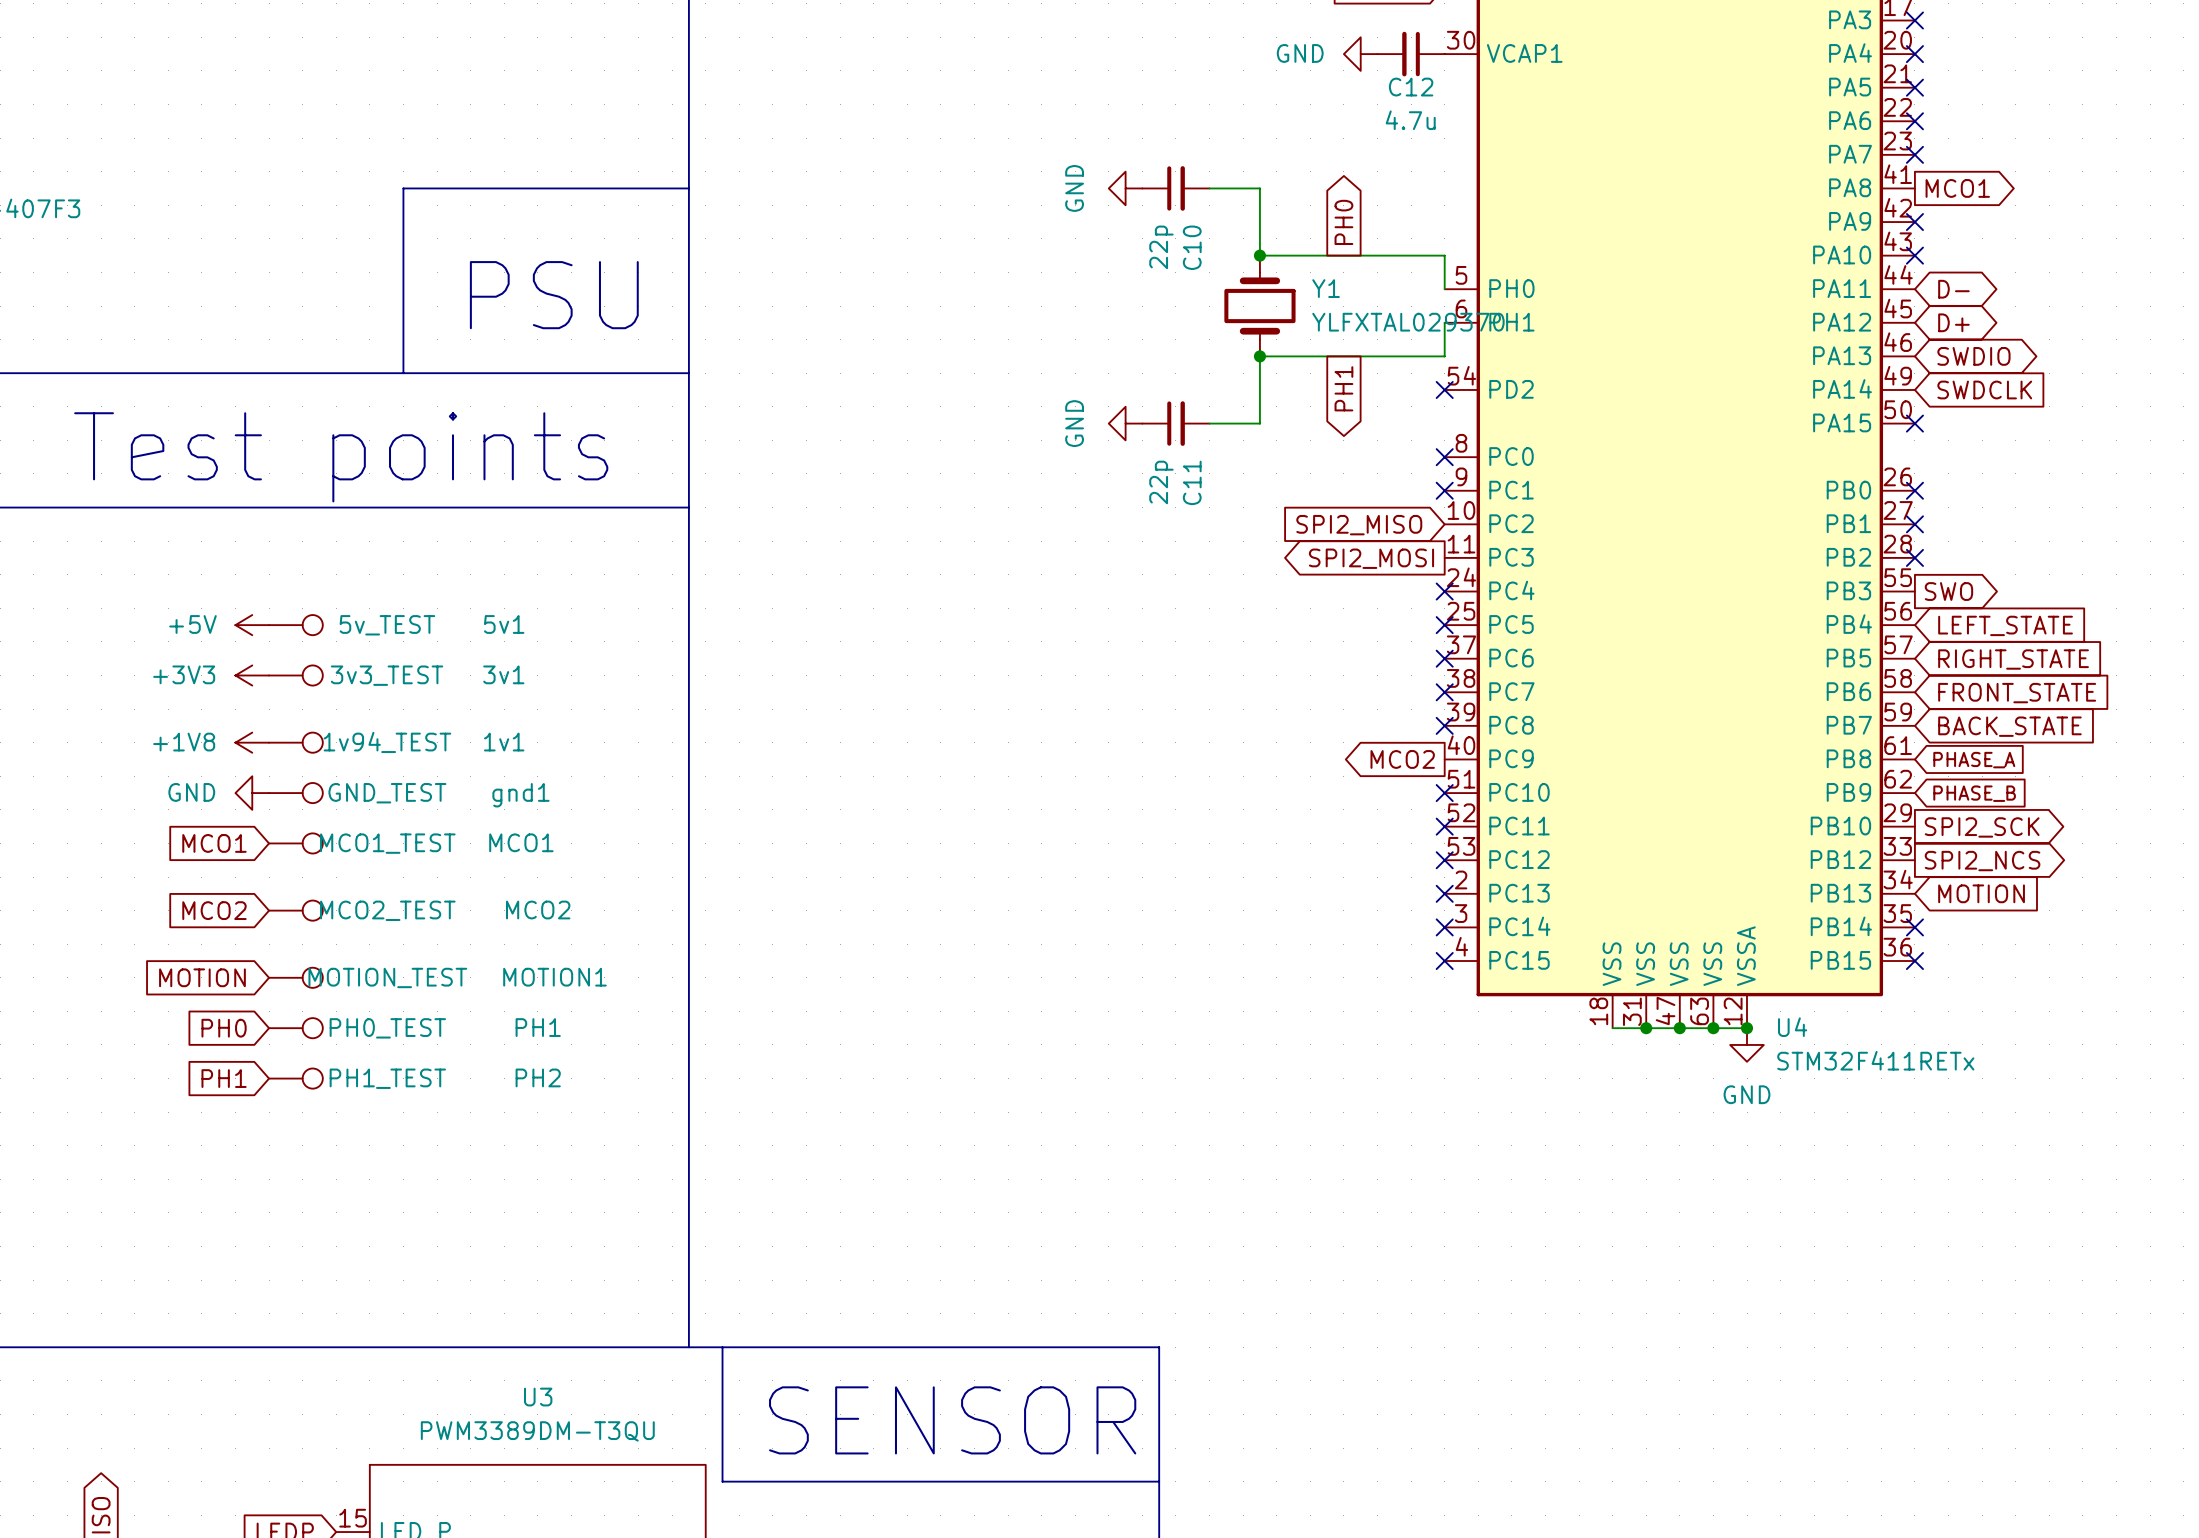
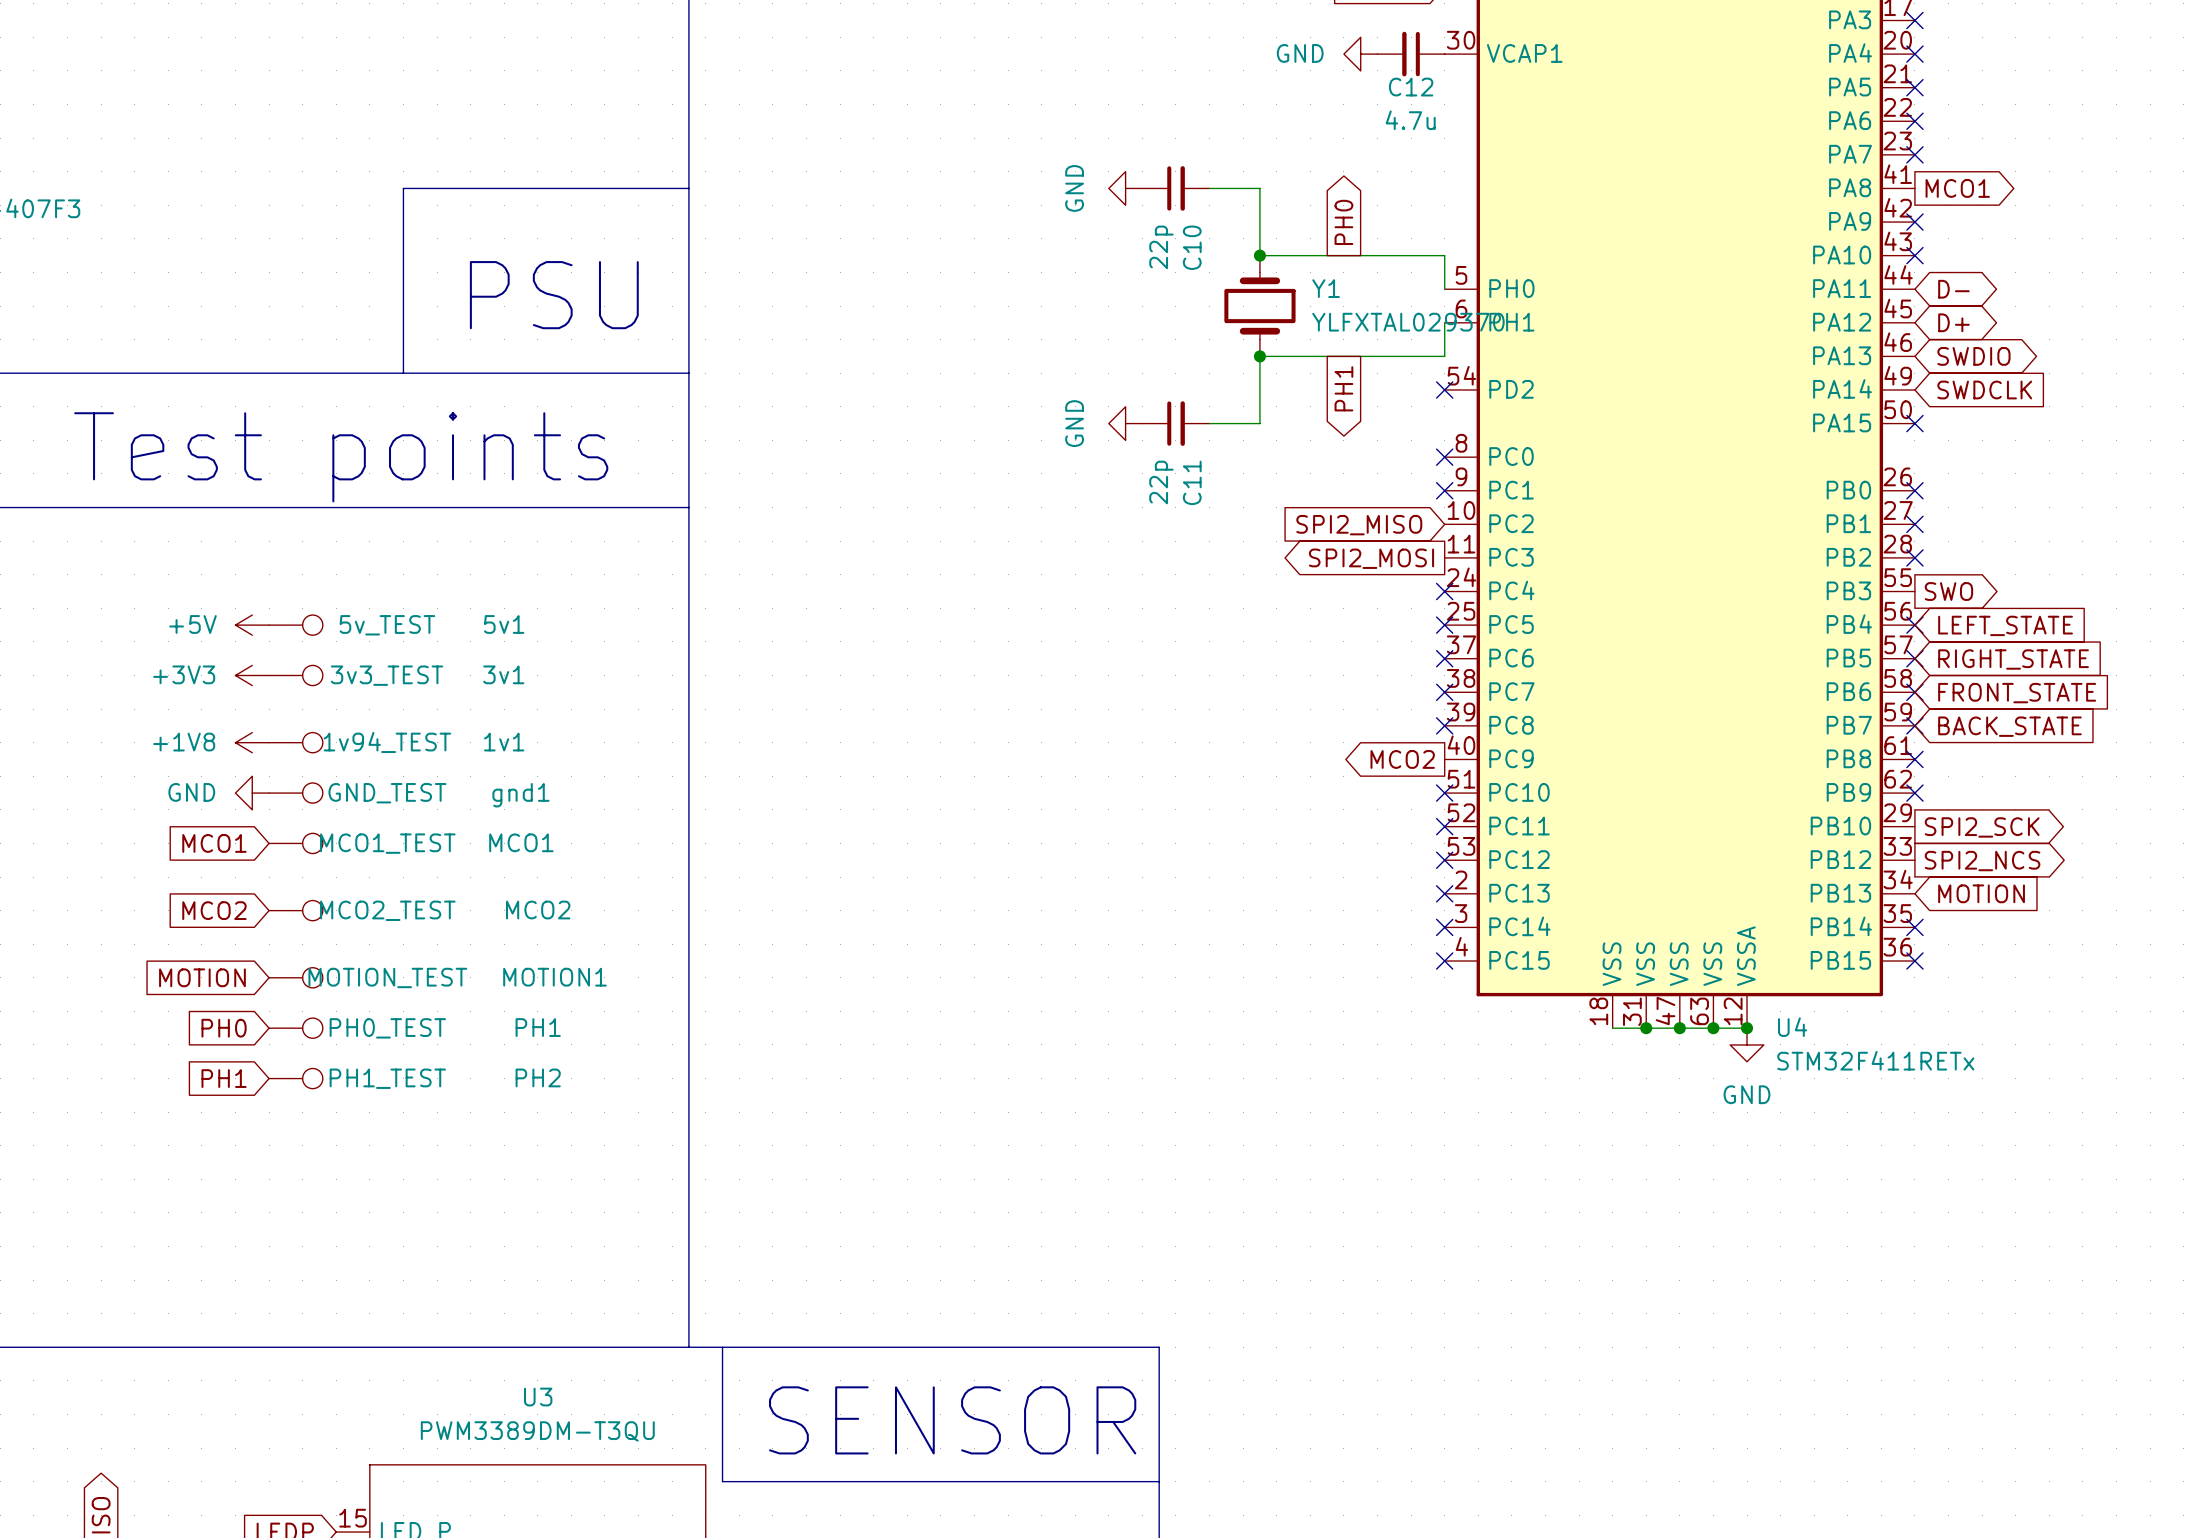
no-connect mark: none -> (1914, 625)
no-connect mark: none -> (1914, 658)
no-connect mark: none -> (1914, 692)
no-connect mark: none -> (1914, 725)
no-connect mark: none -> (1914, 759)
global label: PHASE_A (1974, 760) -> none
no-connect mark: none -> (1914, 793)
global label: PHASE_B (1974, 793) -> none

